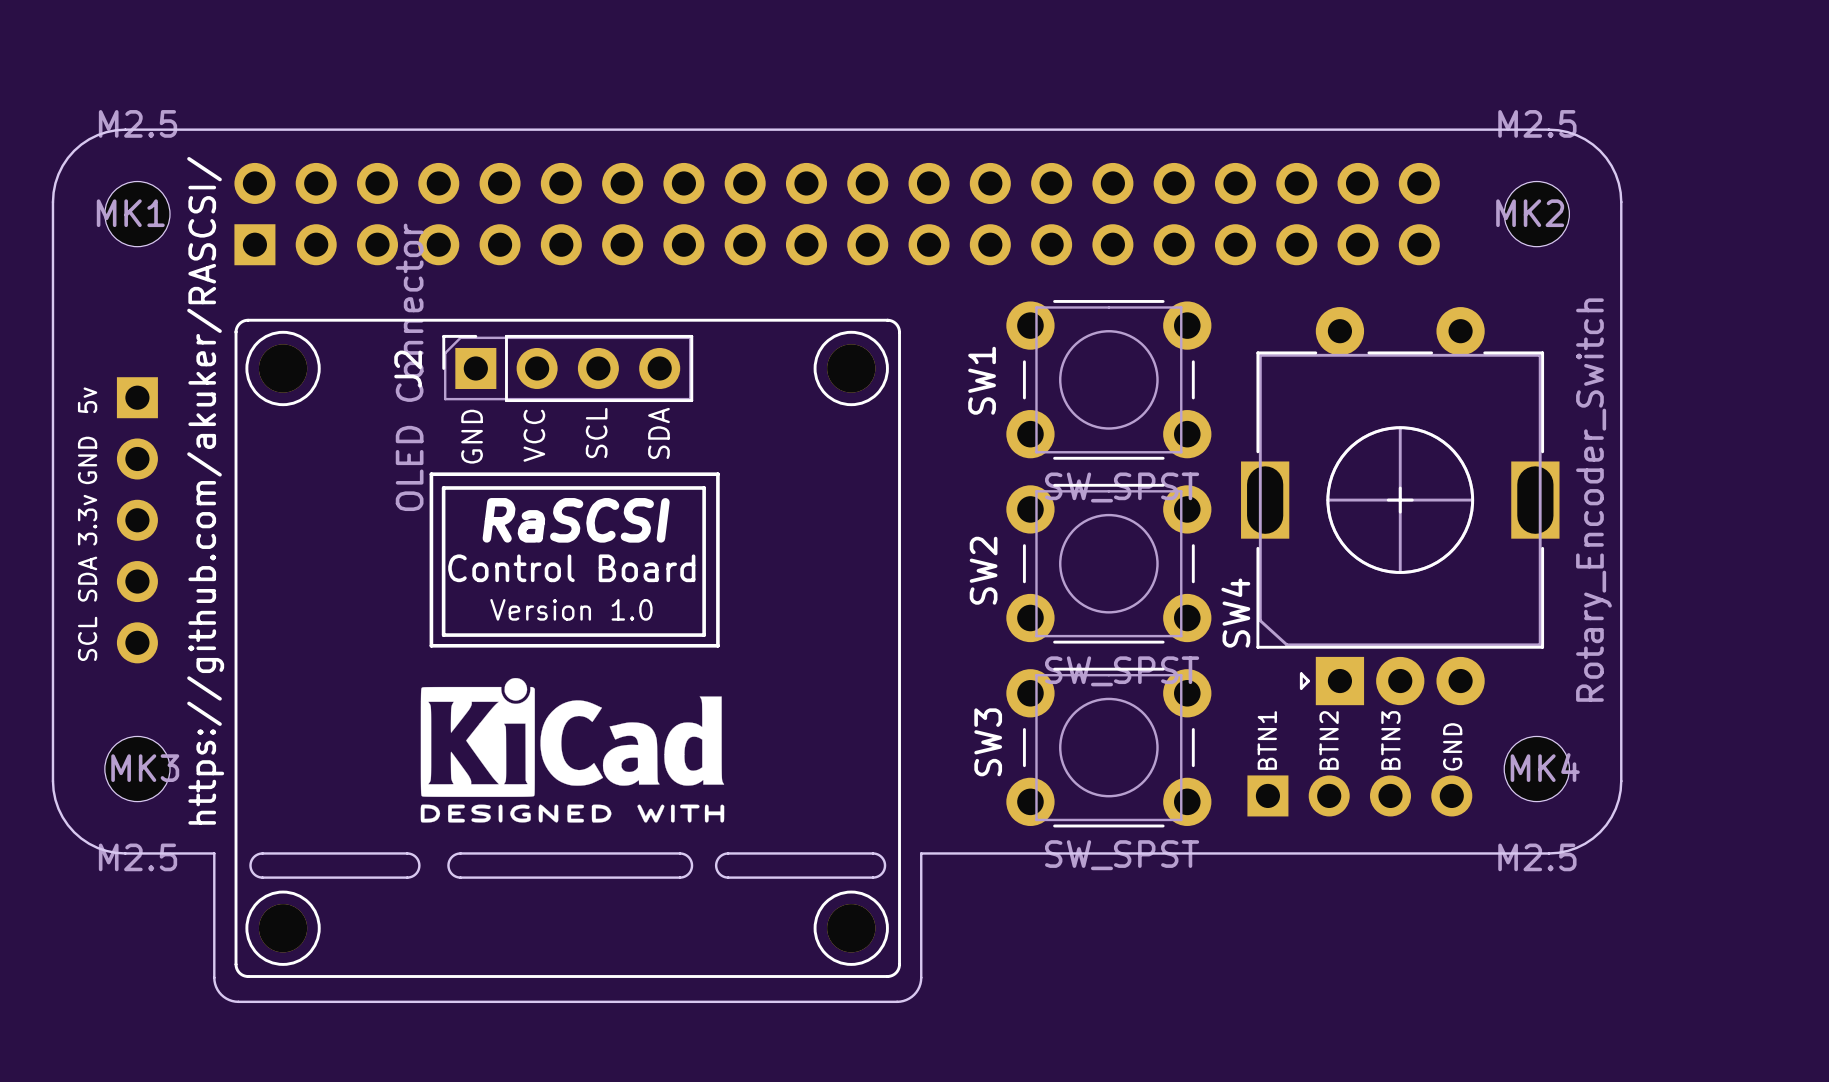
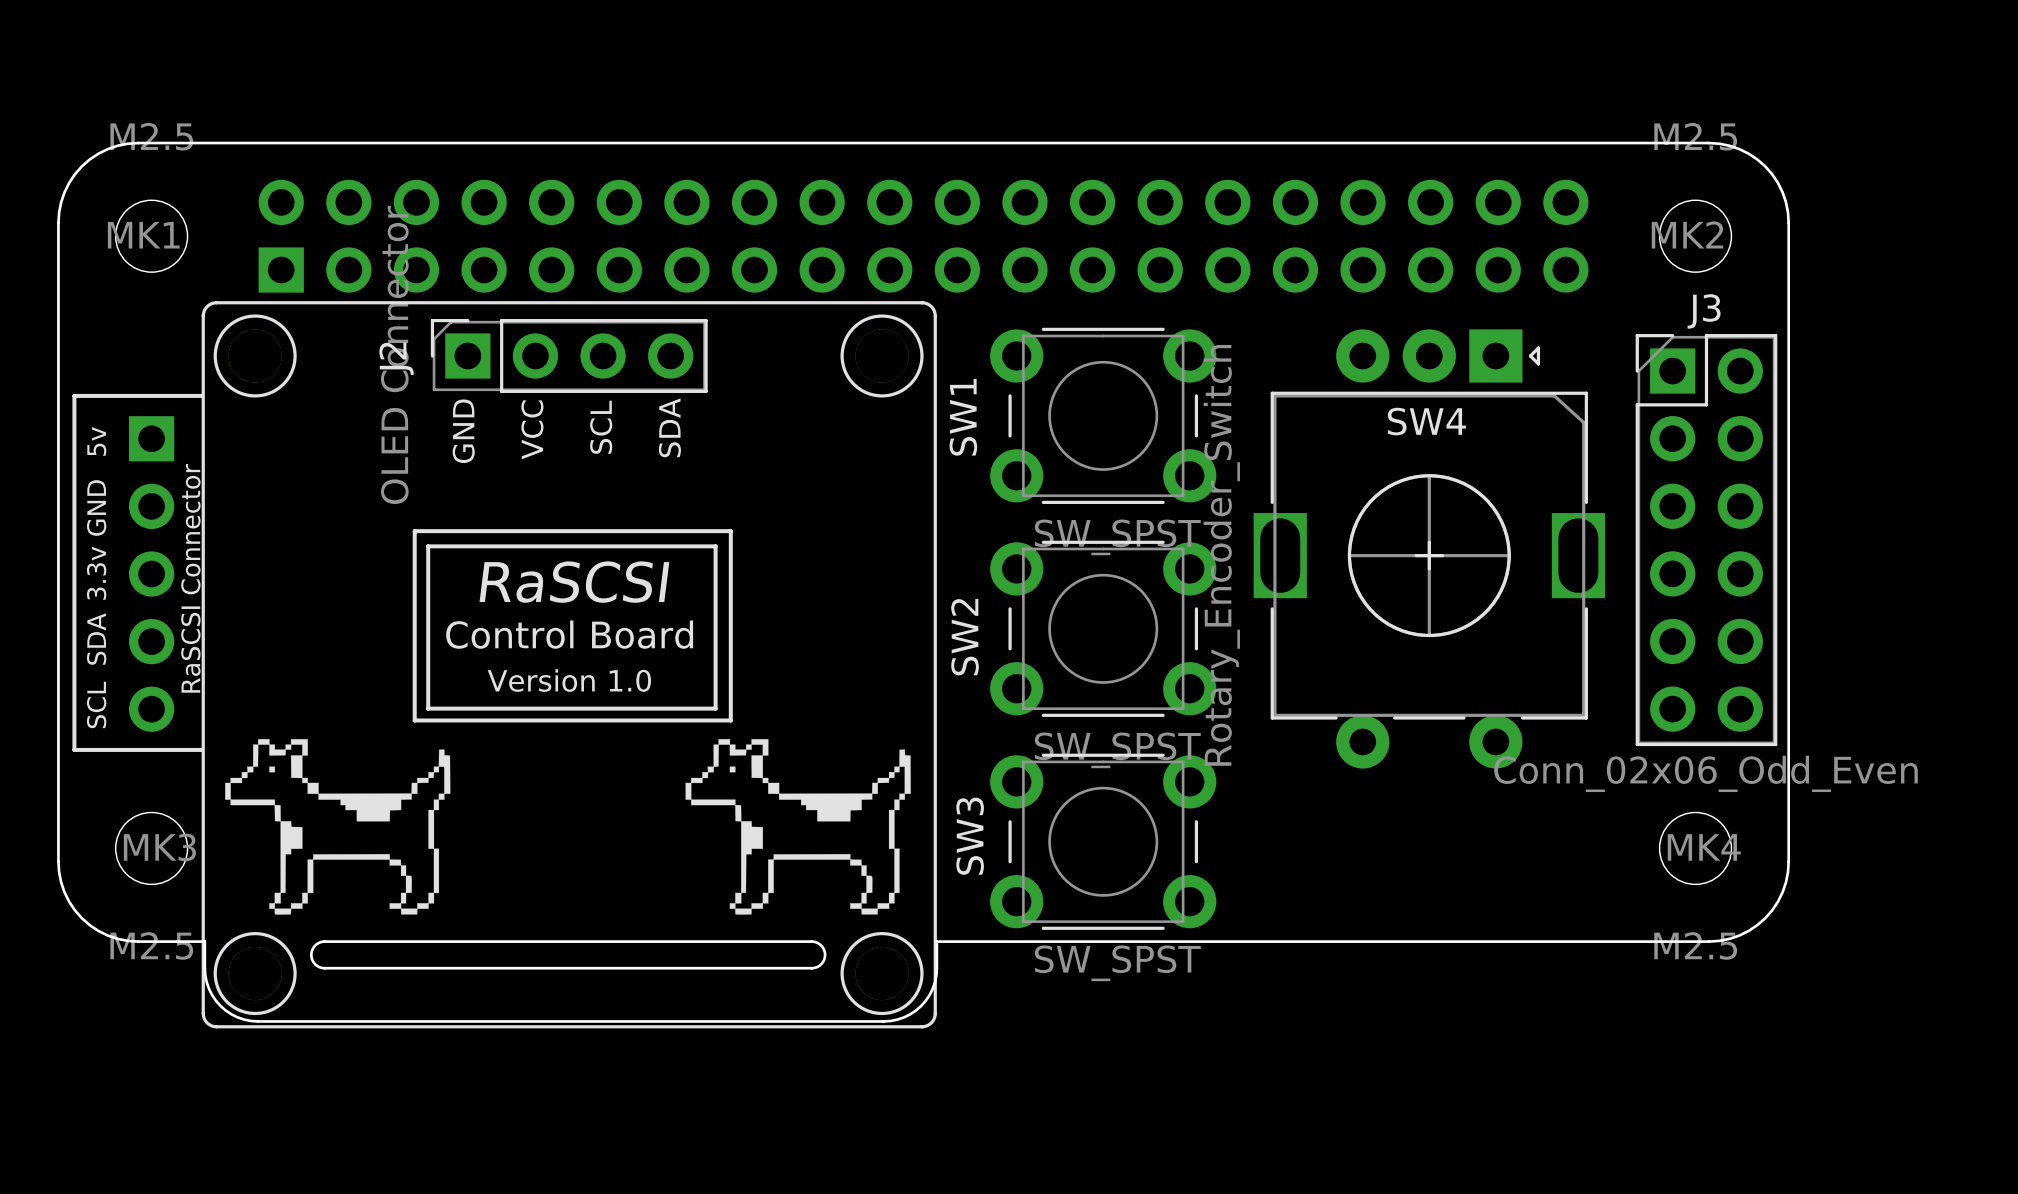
line: none -> (202, 395) (74, 395) (74, 749) (202, 749)
SW1 position: (1108, 379) -> (1103, 415)
line: (431, 474) (431, 645) (717, 645) (717, 474) (431, 474) -> (414, 531) (414, 720) (730, 720) (730, 531) (414, 531)
line: (443, 487) (443, 635) (704, 635) (704, 487) (443, 487) -> (428, 546) (428, 708) (715, 708) (715, 546) (428, 546)
J3: none -> Conn_02x06_Odd_Even (1706, 540)
text: https://github.com/akuker/RASCSI/ (205, 490) -> none
SW4 rotation: 0° (1400, 506) -> 180° (1429, 548)
text position: RaSCSI (576, 520) -> RaSCSI (574, 582)
text: none -> RaSCSI Connector (190, 578)
SW2 position: (1108, 563) -> (1103, 628)
text position: Control Board (571, 568) -> Control Board (569, 634)
text position: Version 1.0 (571, 609) -> Version 1.0 (569, 680)
SW4 name position: SW4 (1235, 613) -> SW4 (1426, 421)
J2 position: (567, 648) -> (569, 664)
drawing: none -> [225, 739, 451, 915]
drawing: none -> [685, 739, 911, 915]
drawing: [420, 678, 725, 823] -> none
text: BTN1 (1267, 740) -> none
text: BTN2 (1329, 740) -> none
text: BTN3 (1390, 740) -> none
text: GND (1452, 746) -> none
SW3 position: (1108, 747) -> (1103, 841)
part: (1359, 795) -> none
board edge: (185, 853) (214, 853) (214, 980) (217, 989) (223, 996) (238, 1001) (903, 1001) (916, 992) (921, 980) (921, 853) -> (204, 941) (205, 975) (211, 994) (220, 1005) (231, 1014) (244, 1019) (258, 1021) (890, 1021) (910, 1014) (921, 1005) (929, 994) (936, 975) (936, 941)
board edge: (294, 853) (259, 853) (252, 858) (250, 865) (252, 872) (259, 877) (294, 877) -> (324, 941) (315, 945) (311, 954) (315, 964) (324, 968)
board edge: (407, 853) (415, 857) (419, 865) (415, 874) (407, 877) -> (449, 941) (508, 941)
board edge: (460, 853) (451, 857) (448, 865) (451, 874) (460, 877) -> (449, 968) (508, 968)
board edge: (679, 853) (688, 857) (692, 865) (688, 874) (679, 877) -> (750, 941) (803, 941)
board edge: (728, 853) (719, 857) (716, 865) (719, 874) (728, 877) -> (750, 968) (803, 968)
board edge: (735, 853) (849, 853) -> (811, 941) (821, 945) (825, 954) (821, 964) (811, 968)
board edge: (872, 853) (881, 857) (885, 865) (881, 874) (874, 877) (735, 877) -> (963, 941) (1016, 941)

